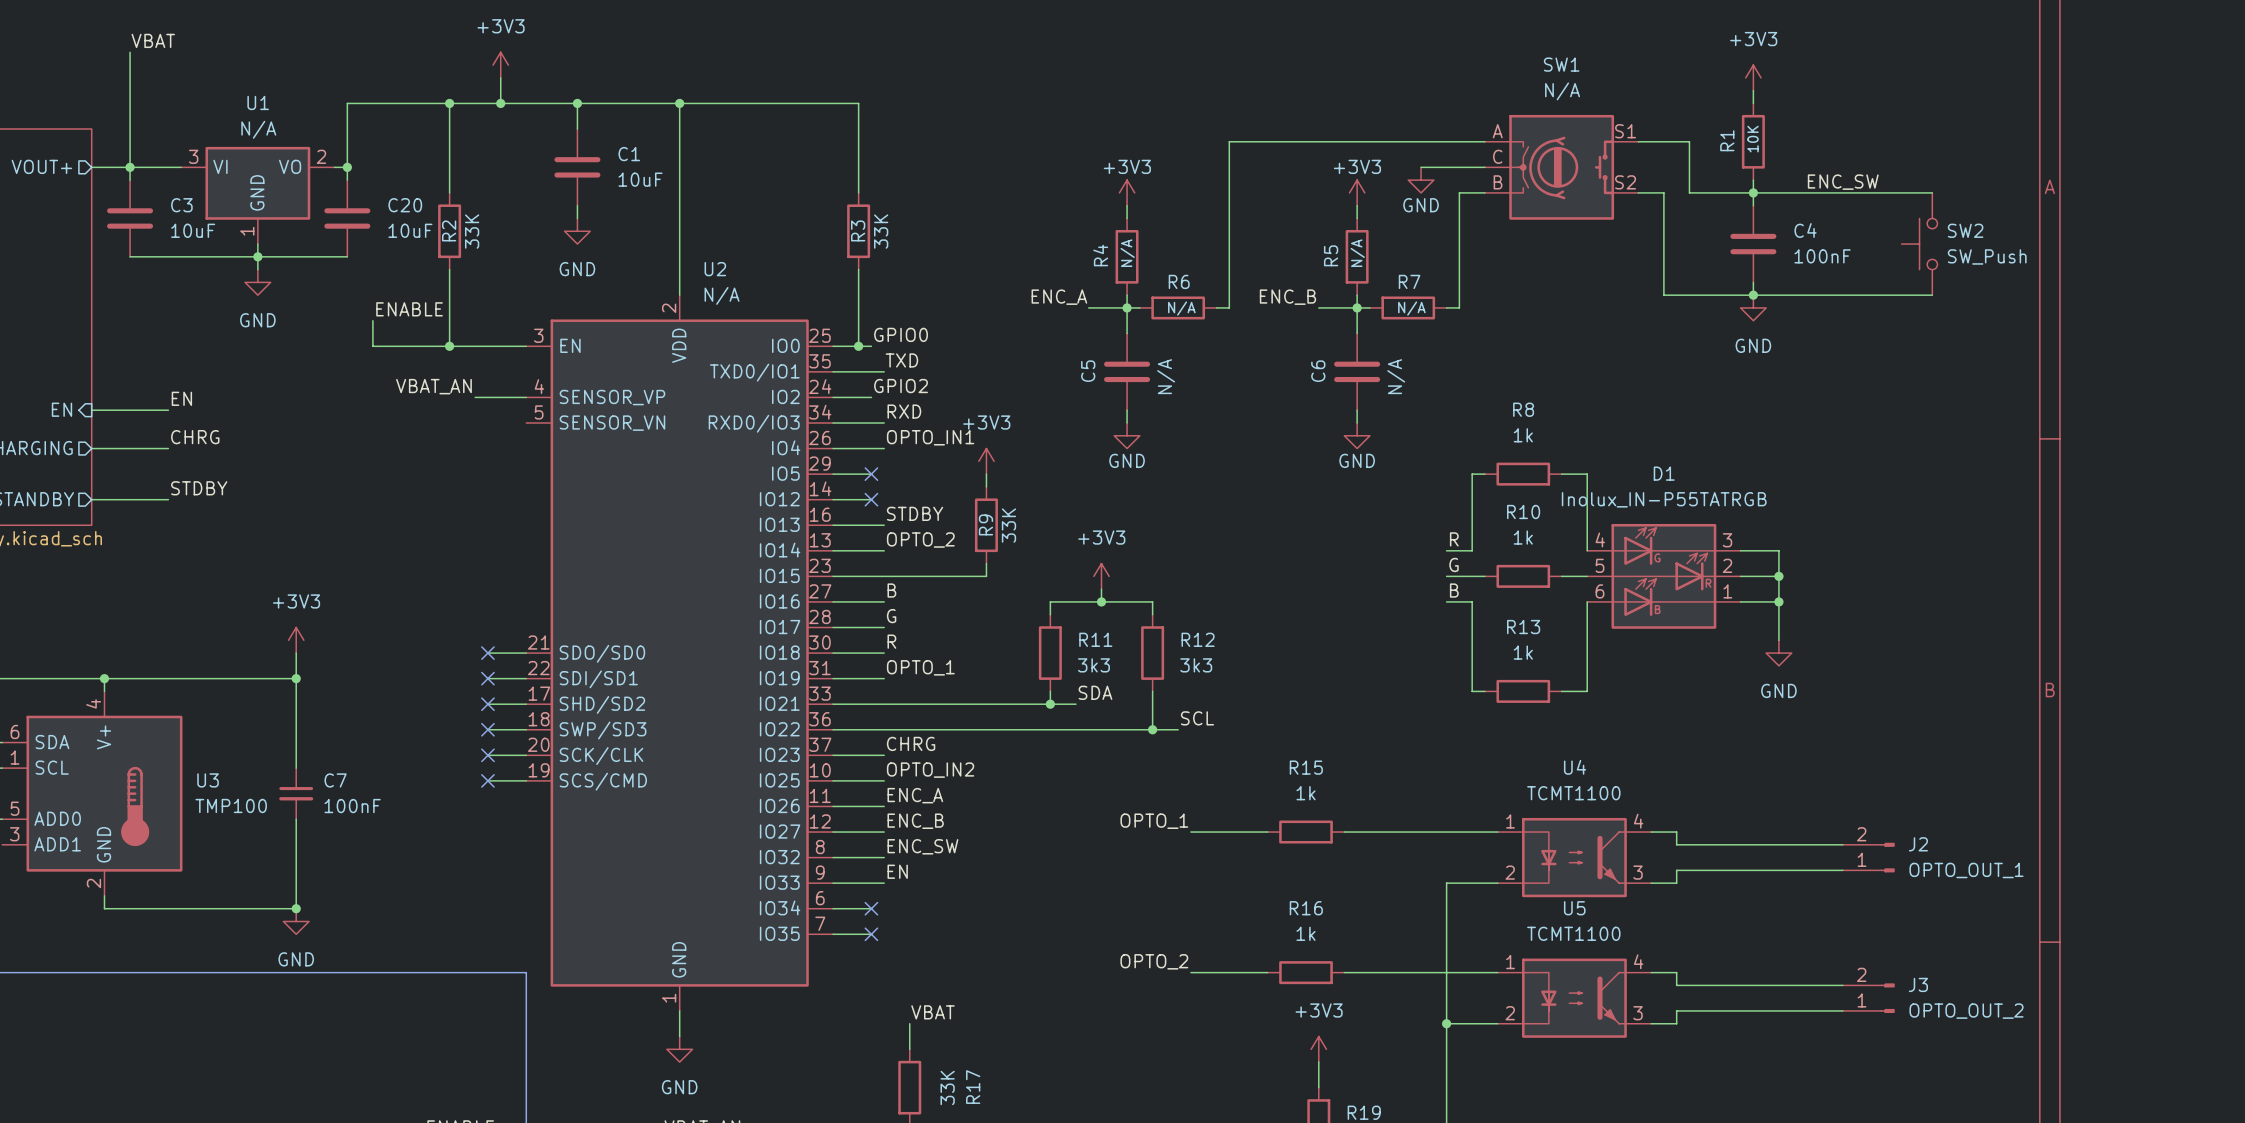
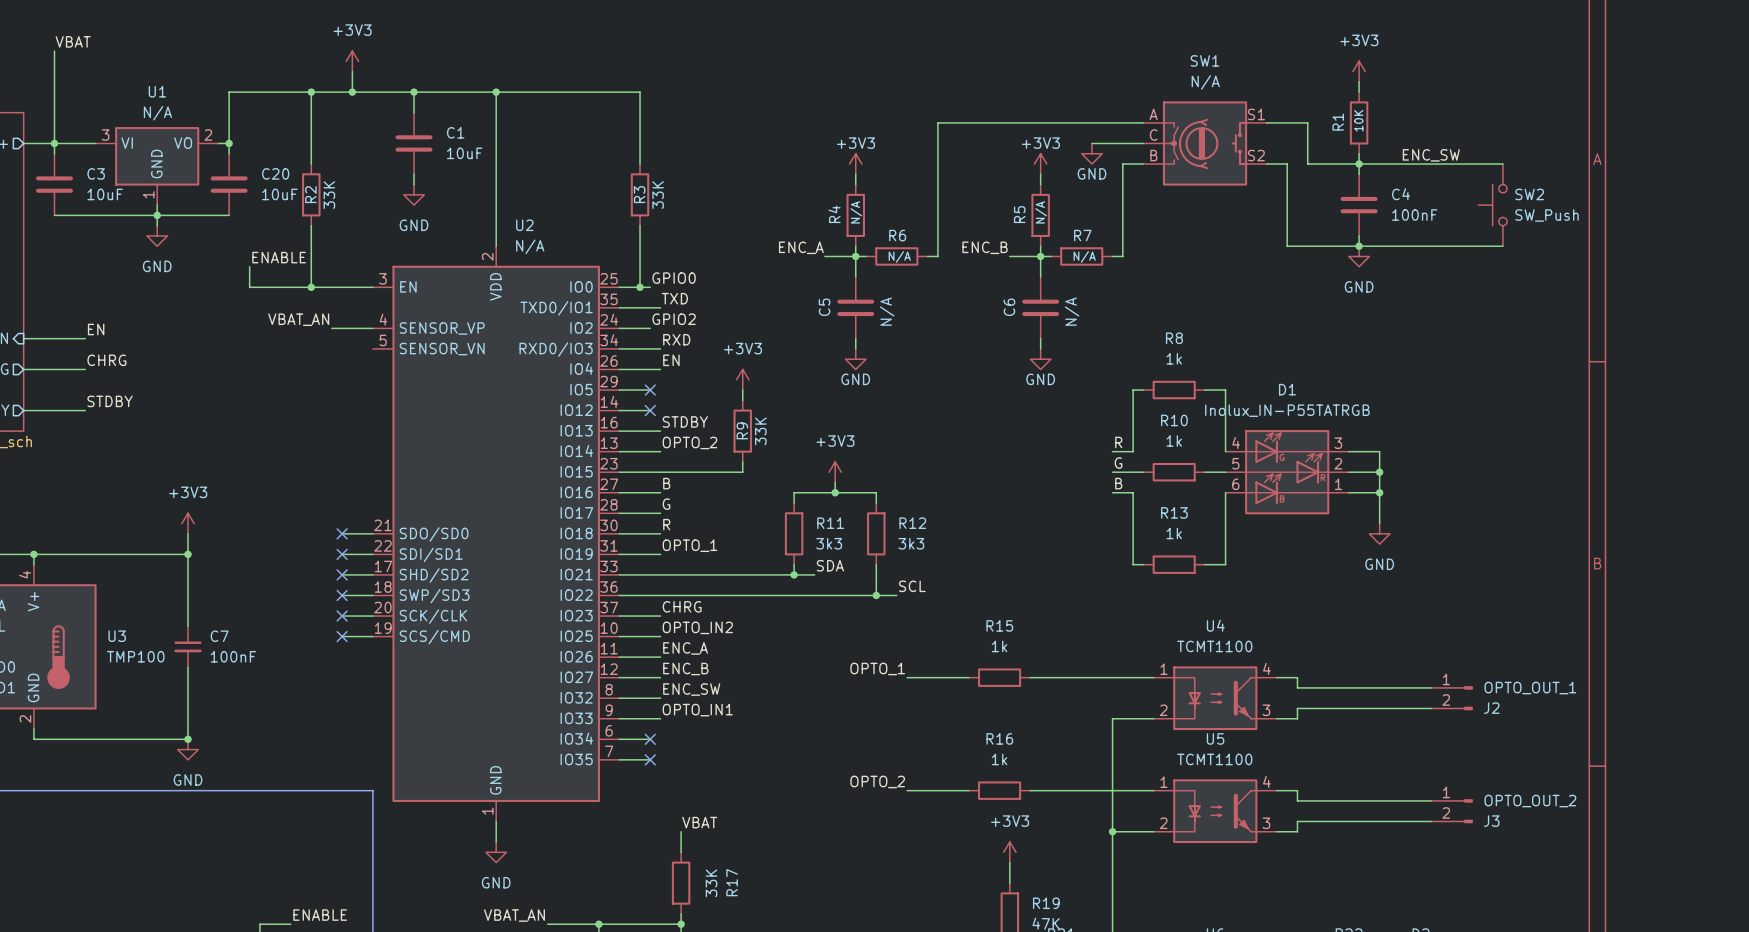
label: OPTO_IN1 (930, 437) -> EN (671, 360)
J2 flip: as is (1887, 857) -> up-down (1466, 698)
label: EN (897, 871) -> OPTO_IN1 (697, 710)
J3 flip: as is (1887, 998) -> up-down (1466, 811)

